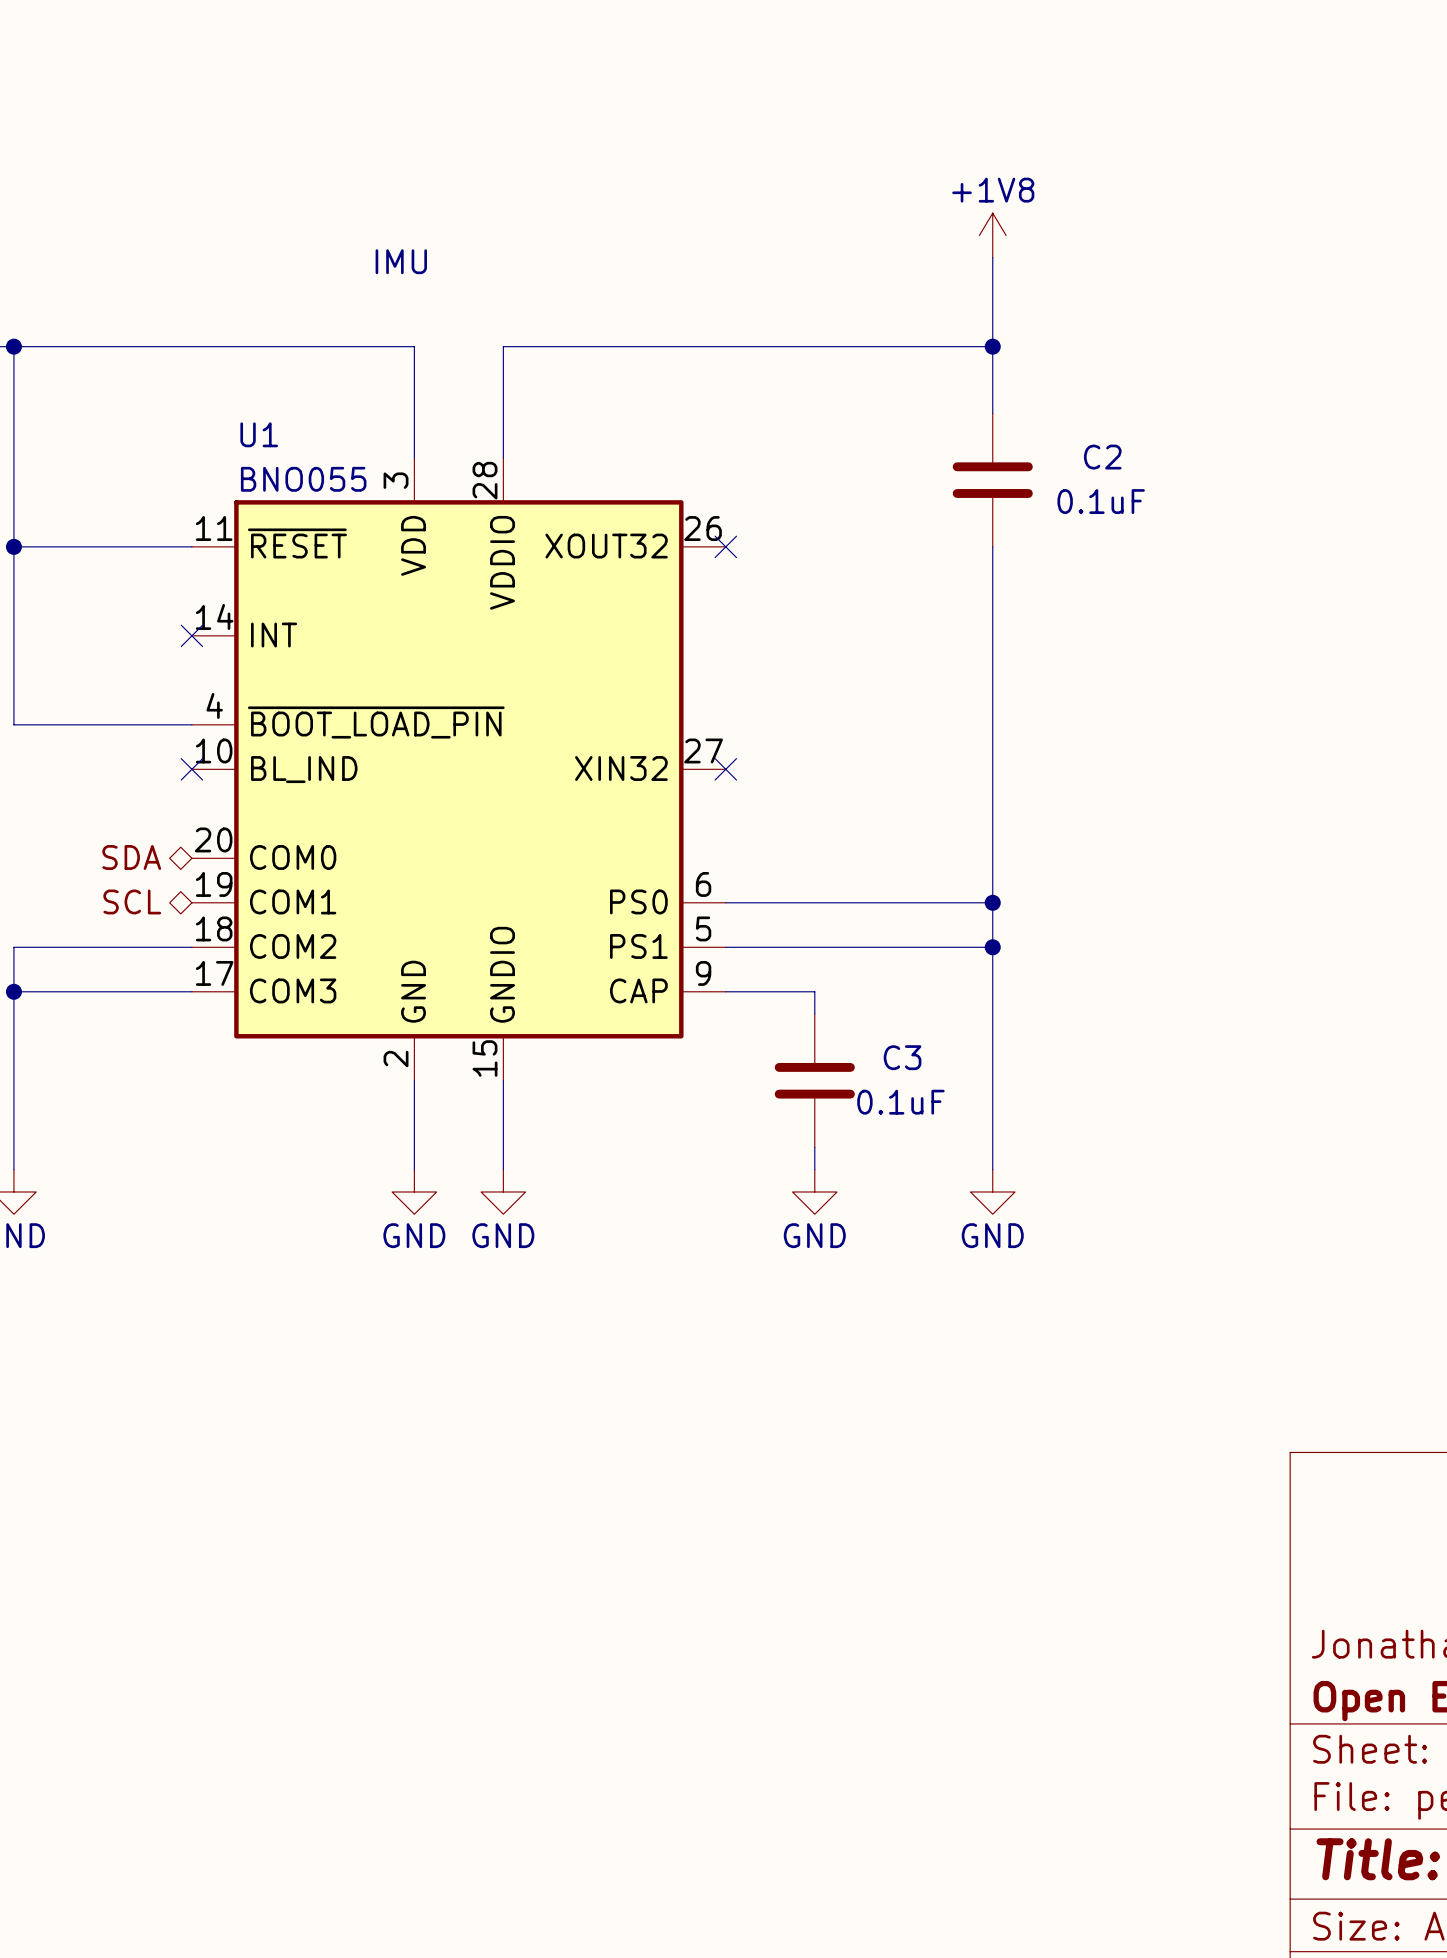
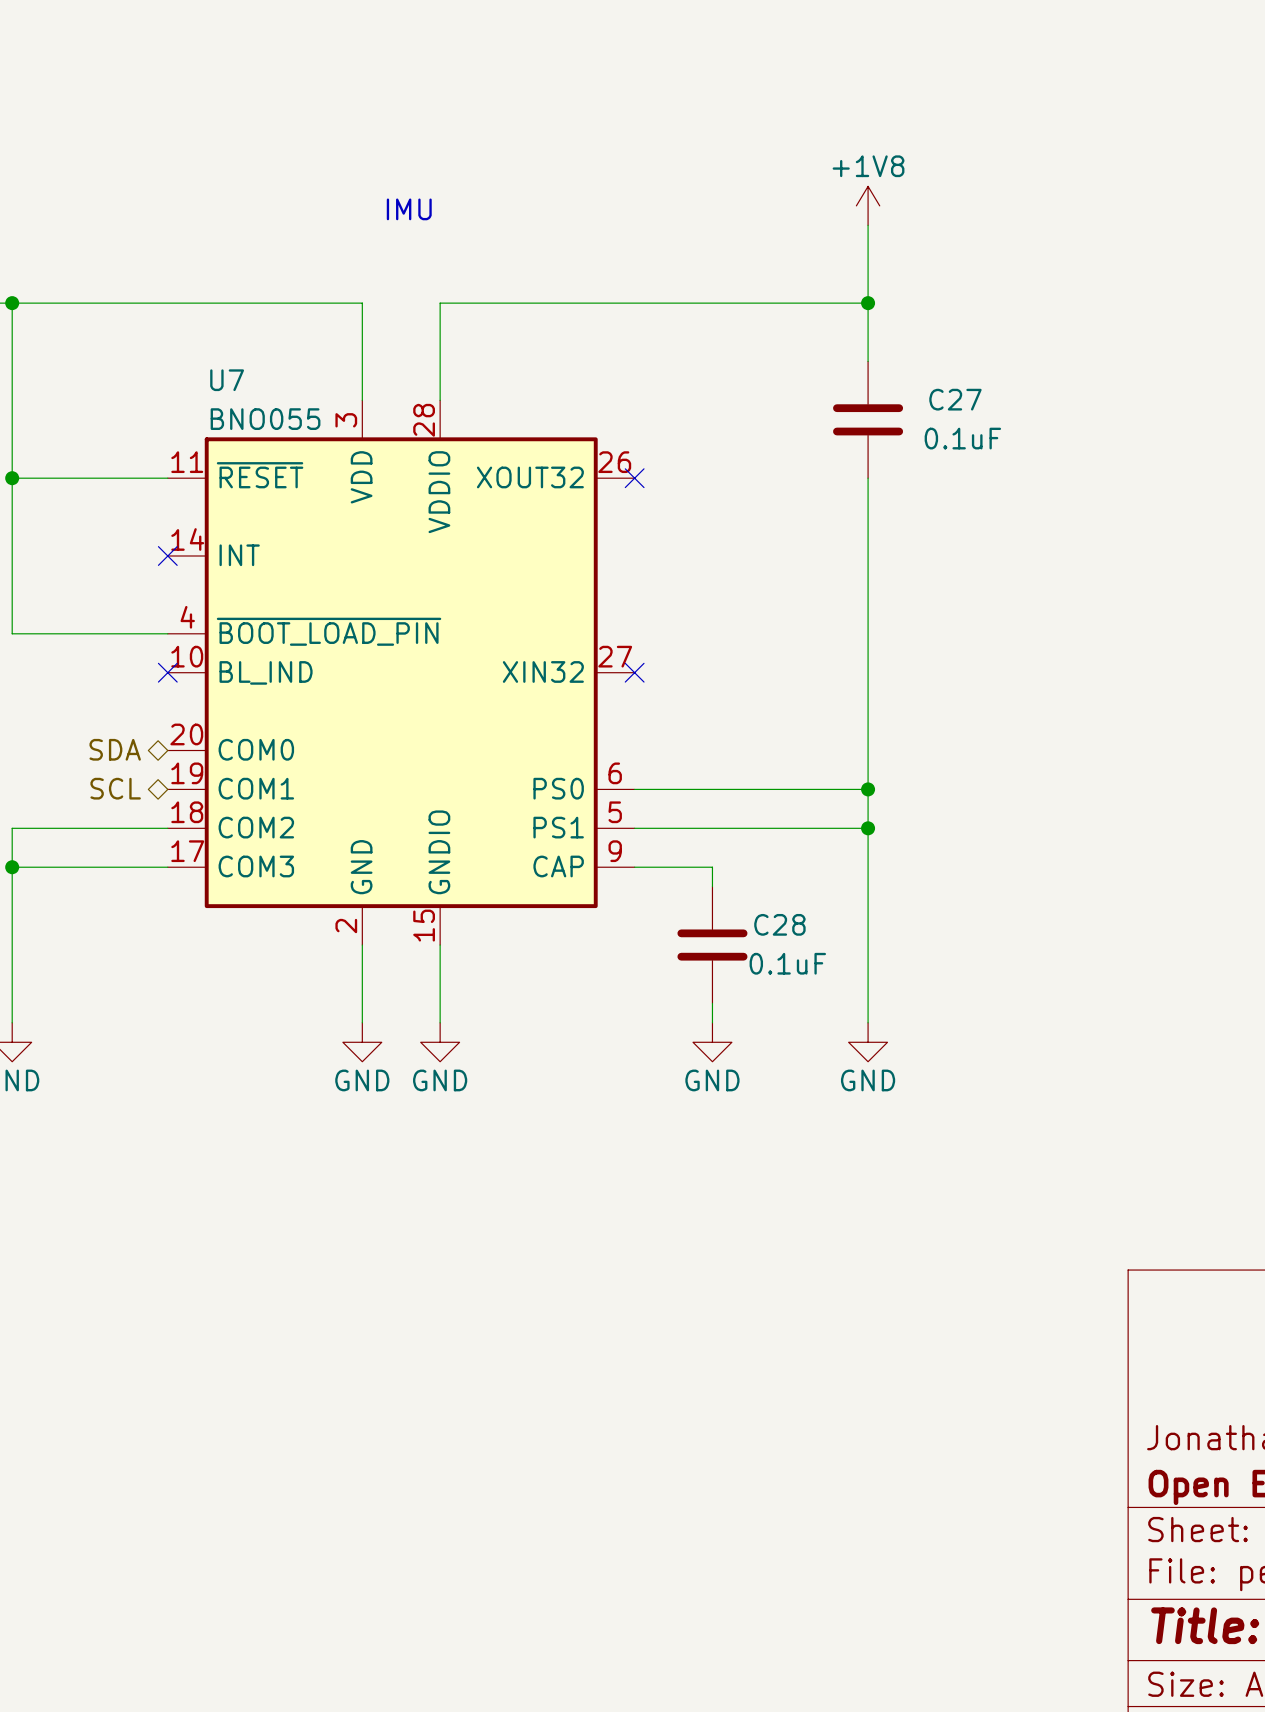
text position: IMU (401, 261) -> IMU (409, 209)
U1 name: U1 (259, 434) -> U7 (227, 380)
C2 name: C2 (1102, 457) -> C27 (955, 399)
C3 name: C3 (902, 1057) -> C28 (779, 924)

